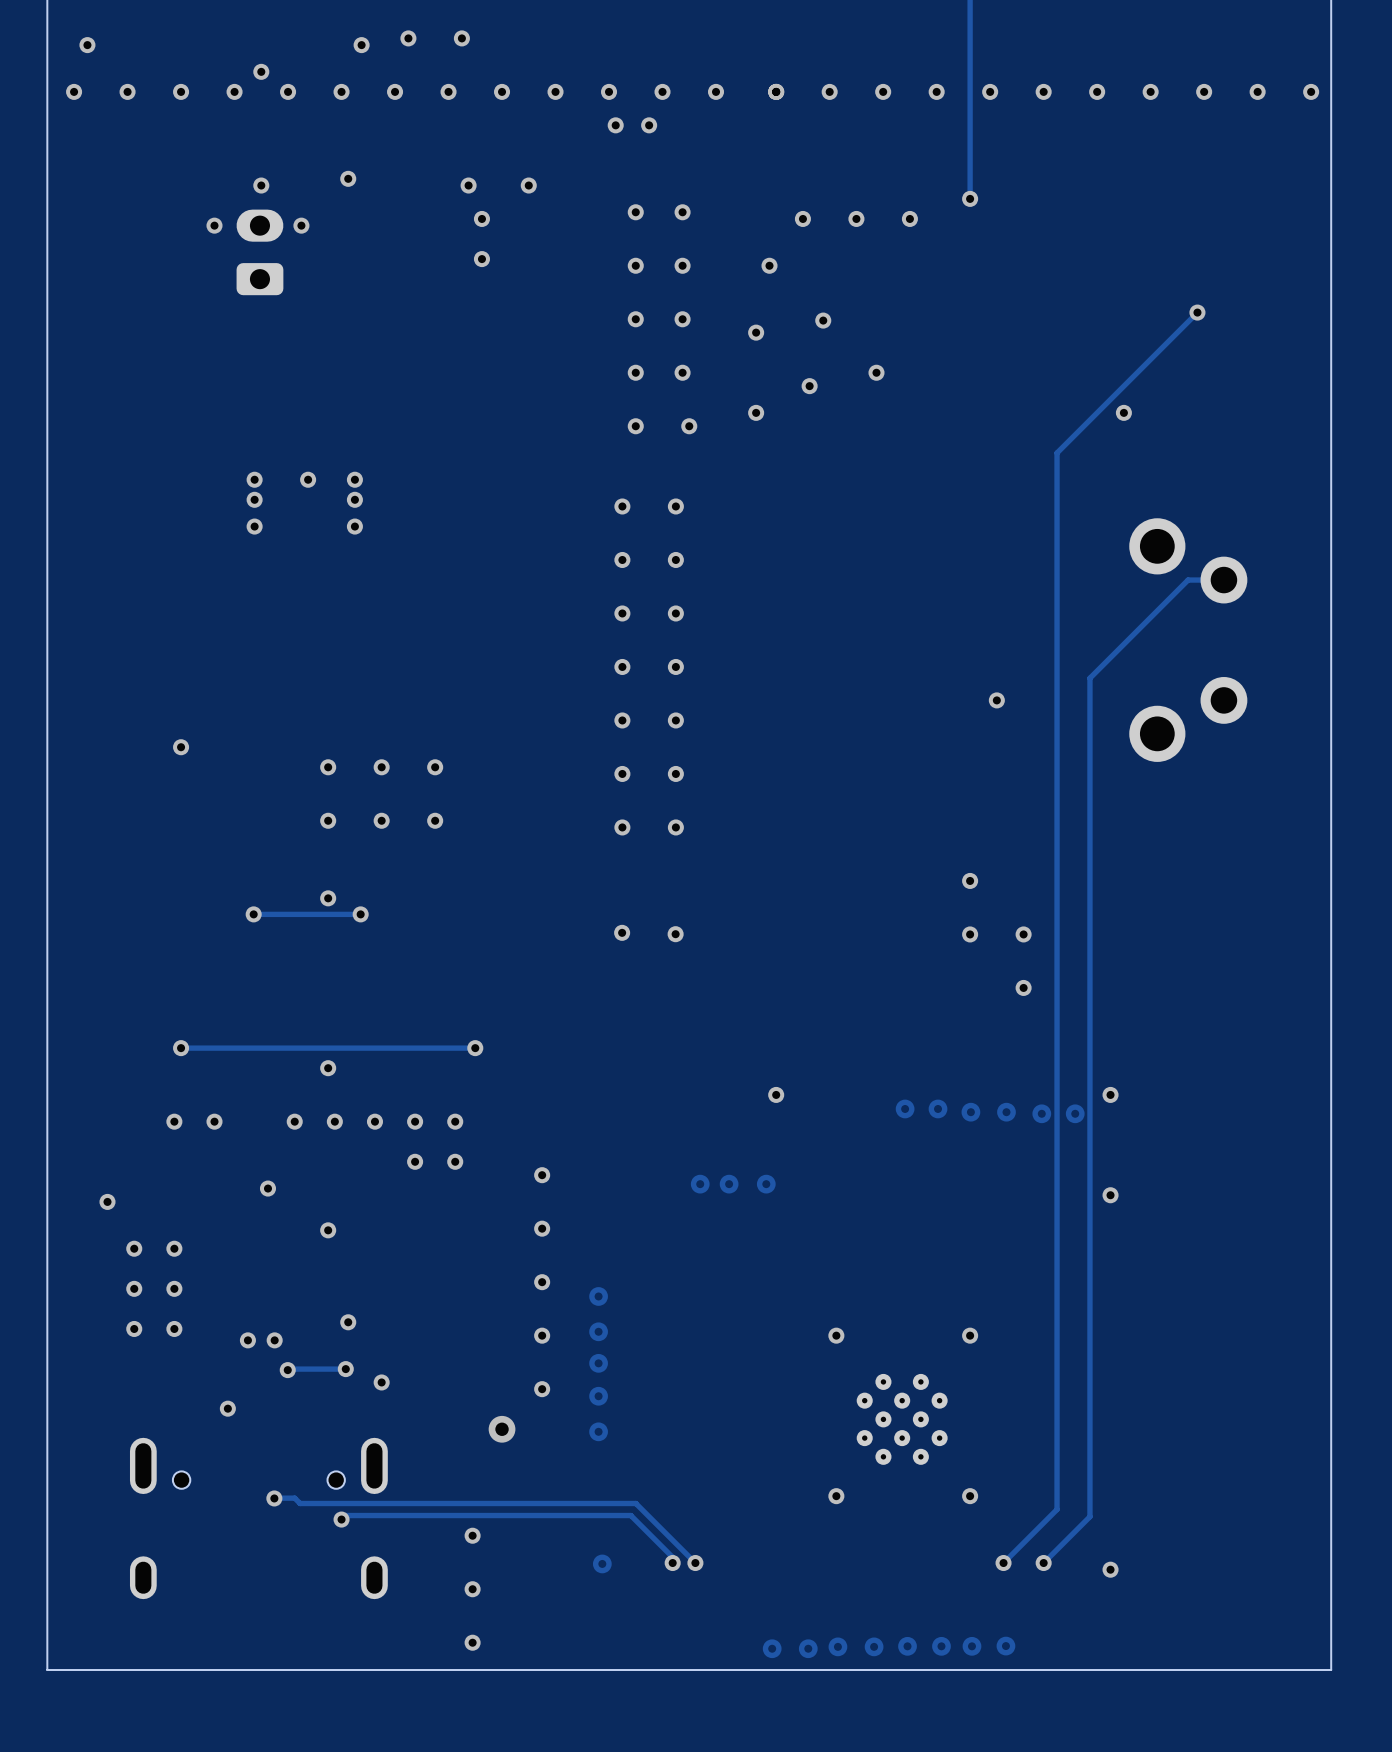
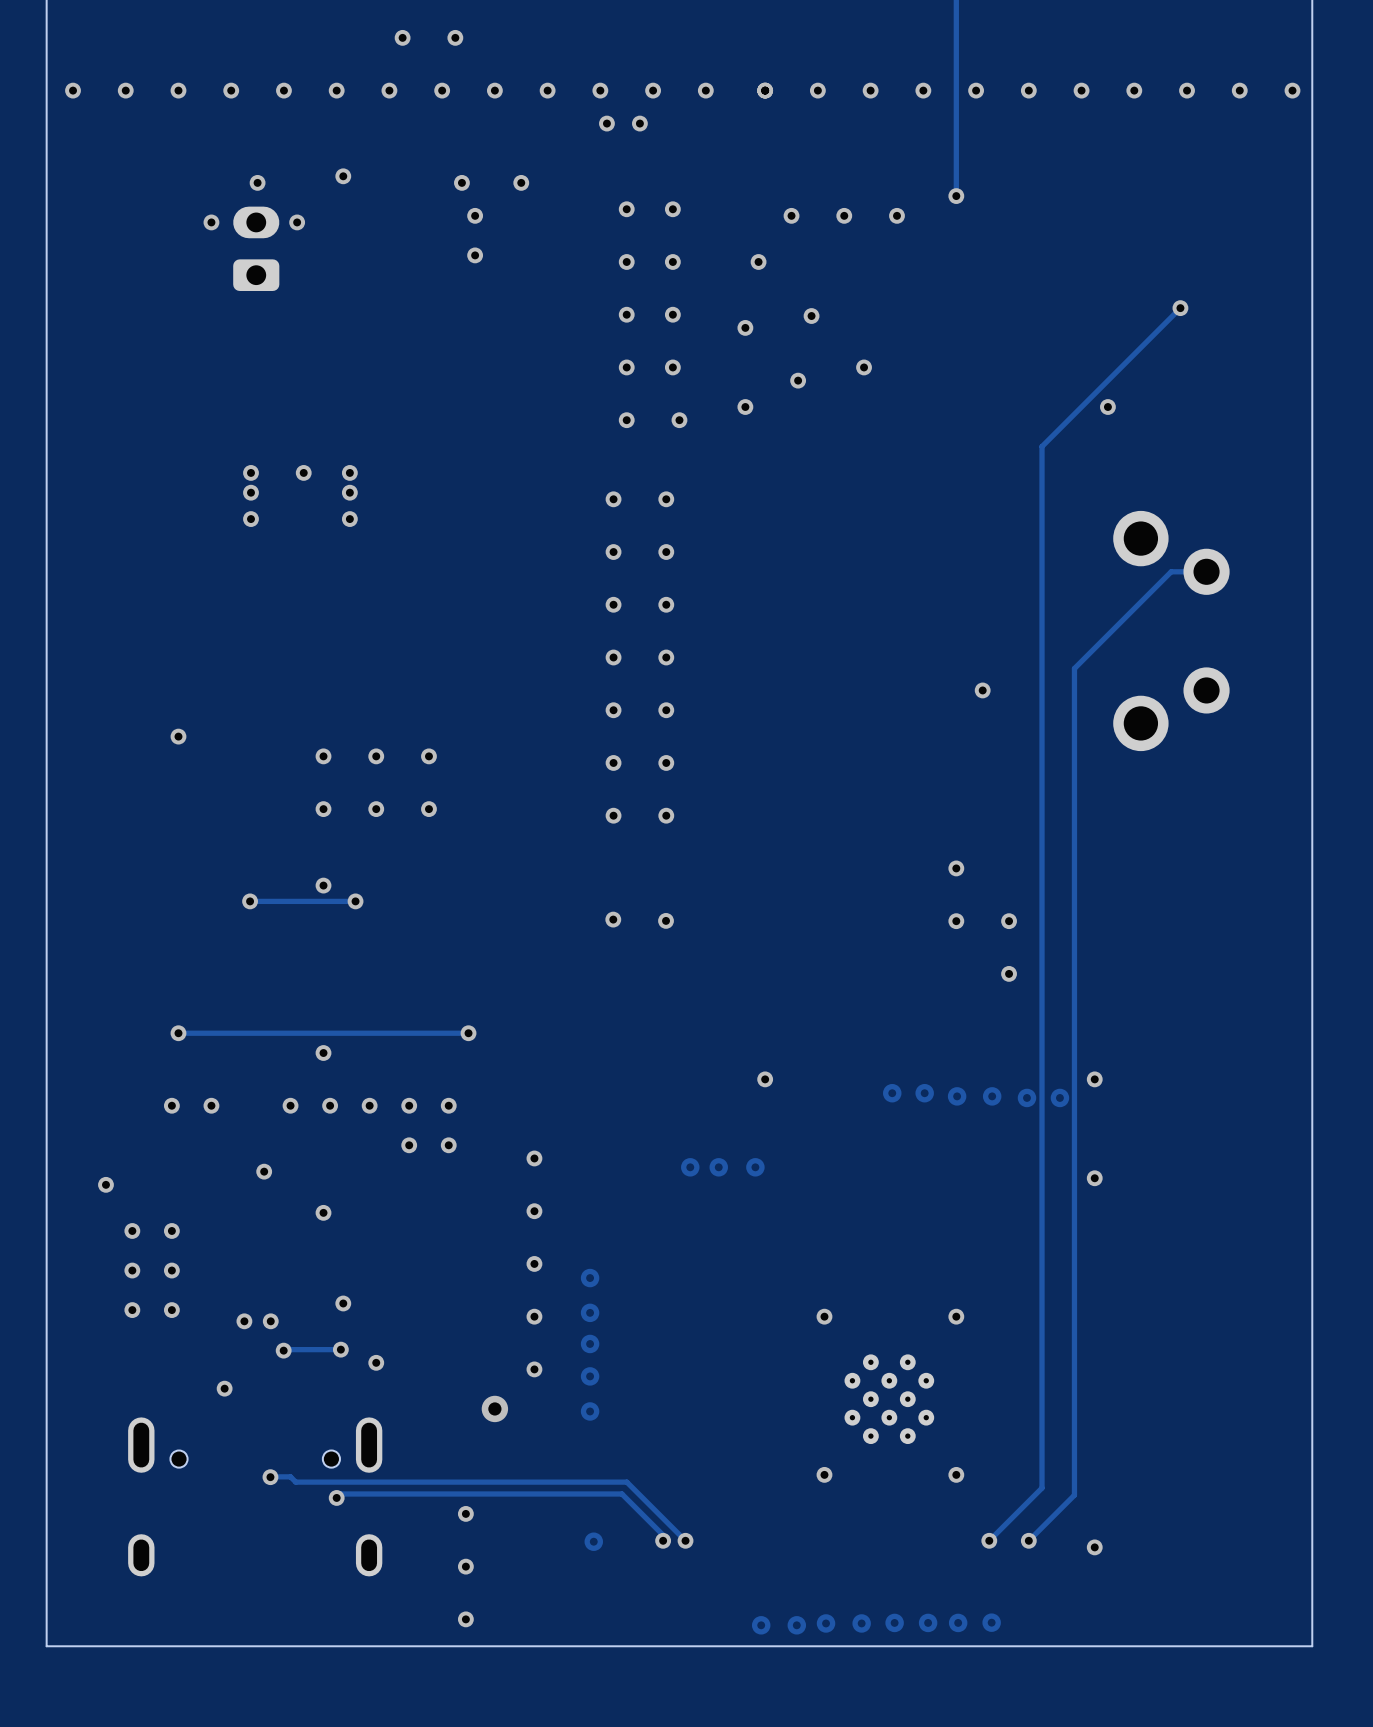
via: (87, 45) -> none
via: (361, 45) -> none
via: (261, 71) -> none

